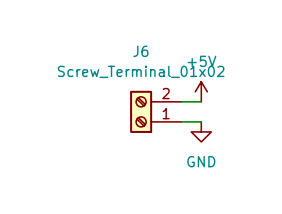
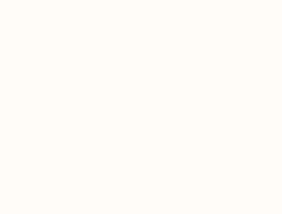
power symbol: +5V (201, 91) -> none
wire: (181, 101) (201, 101) -> none
J6: Screw_Terminal_01x02 (155, 111) -> none
wire: (181, 121) (201, 121) -> none
power symbol: GND (201, 131) -> none

